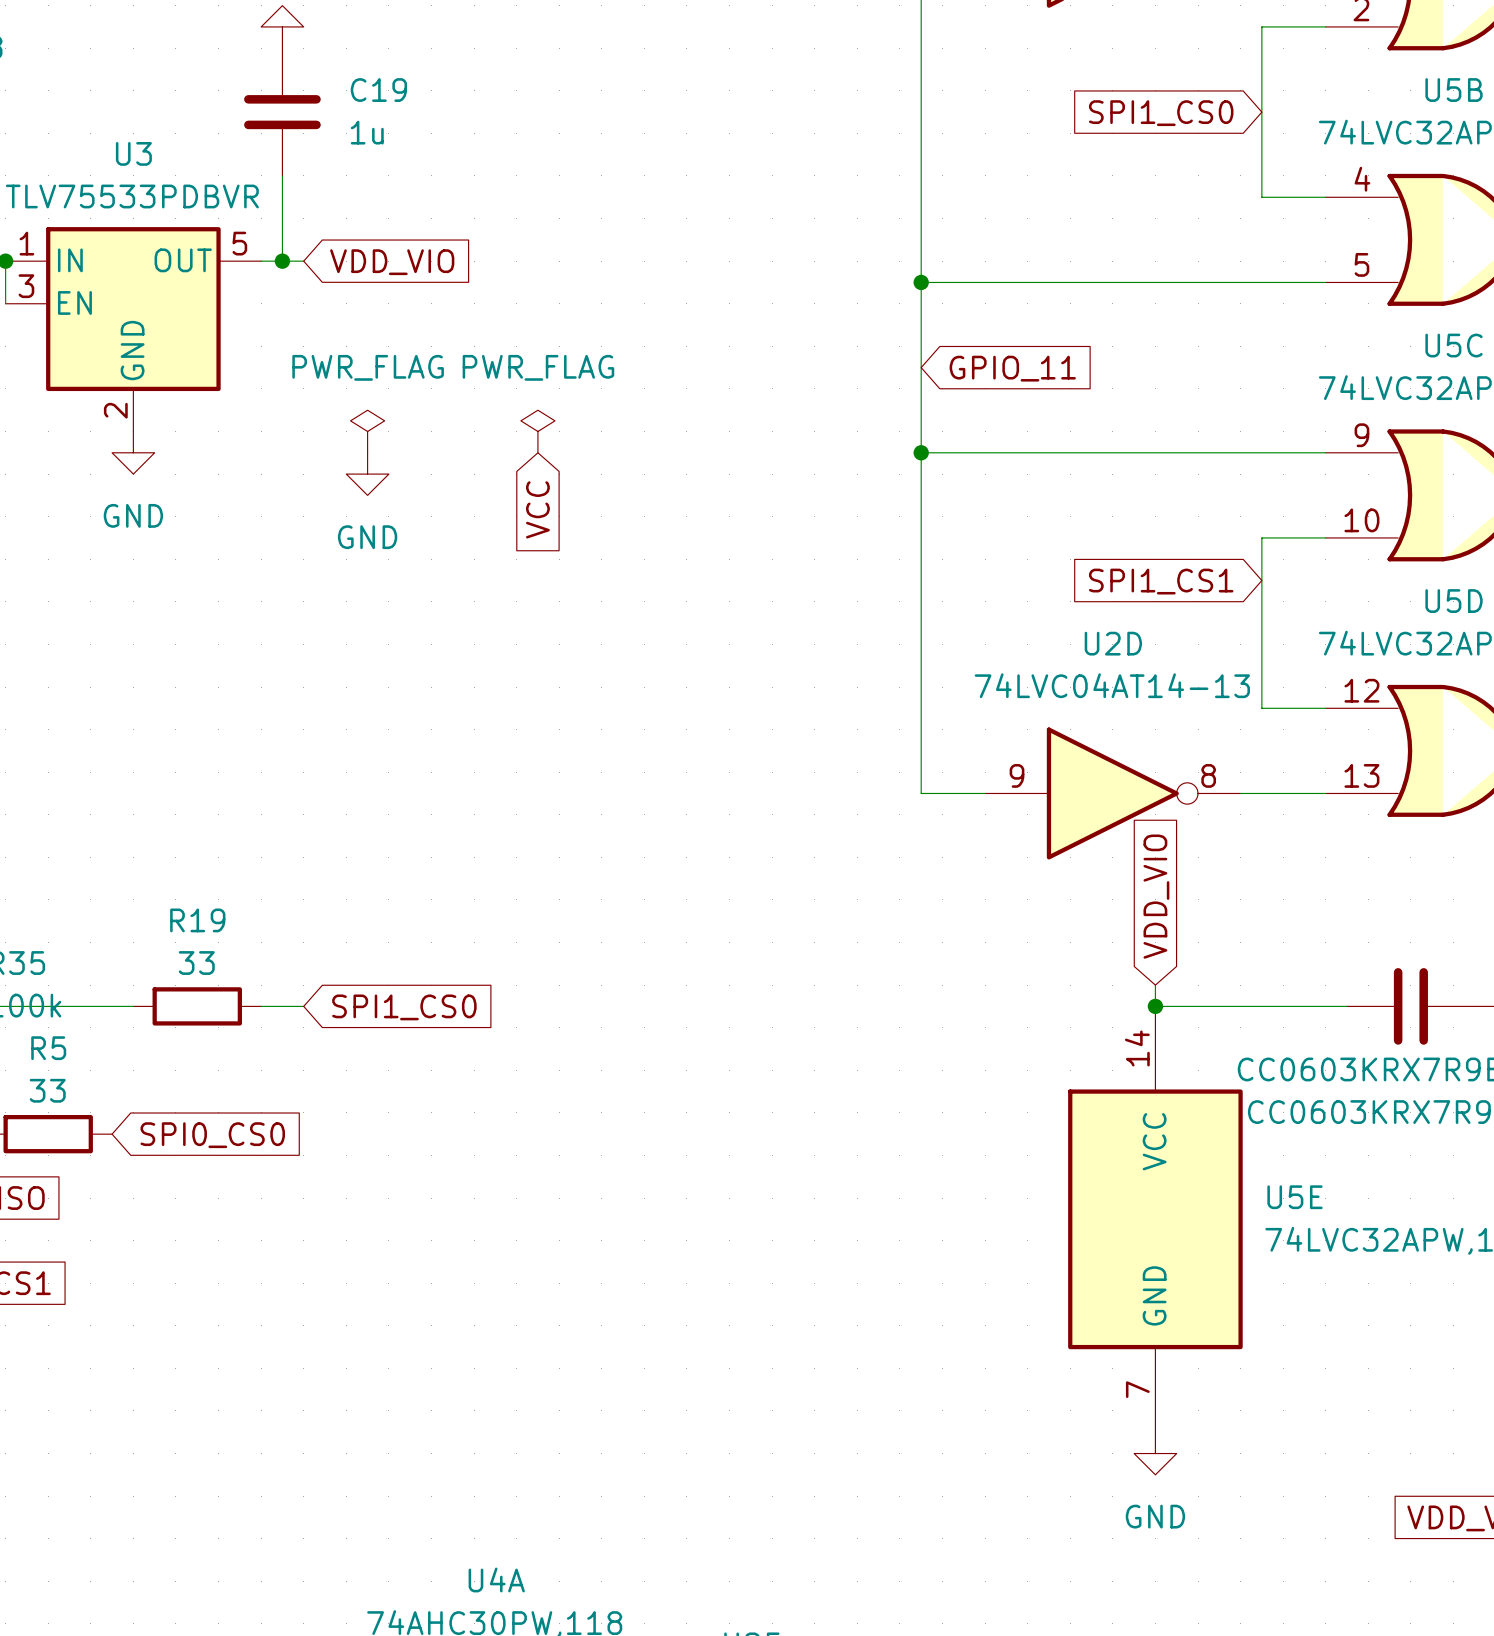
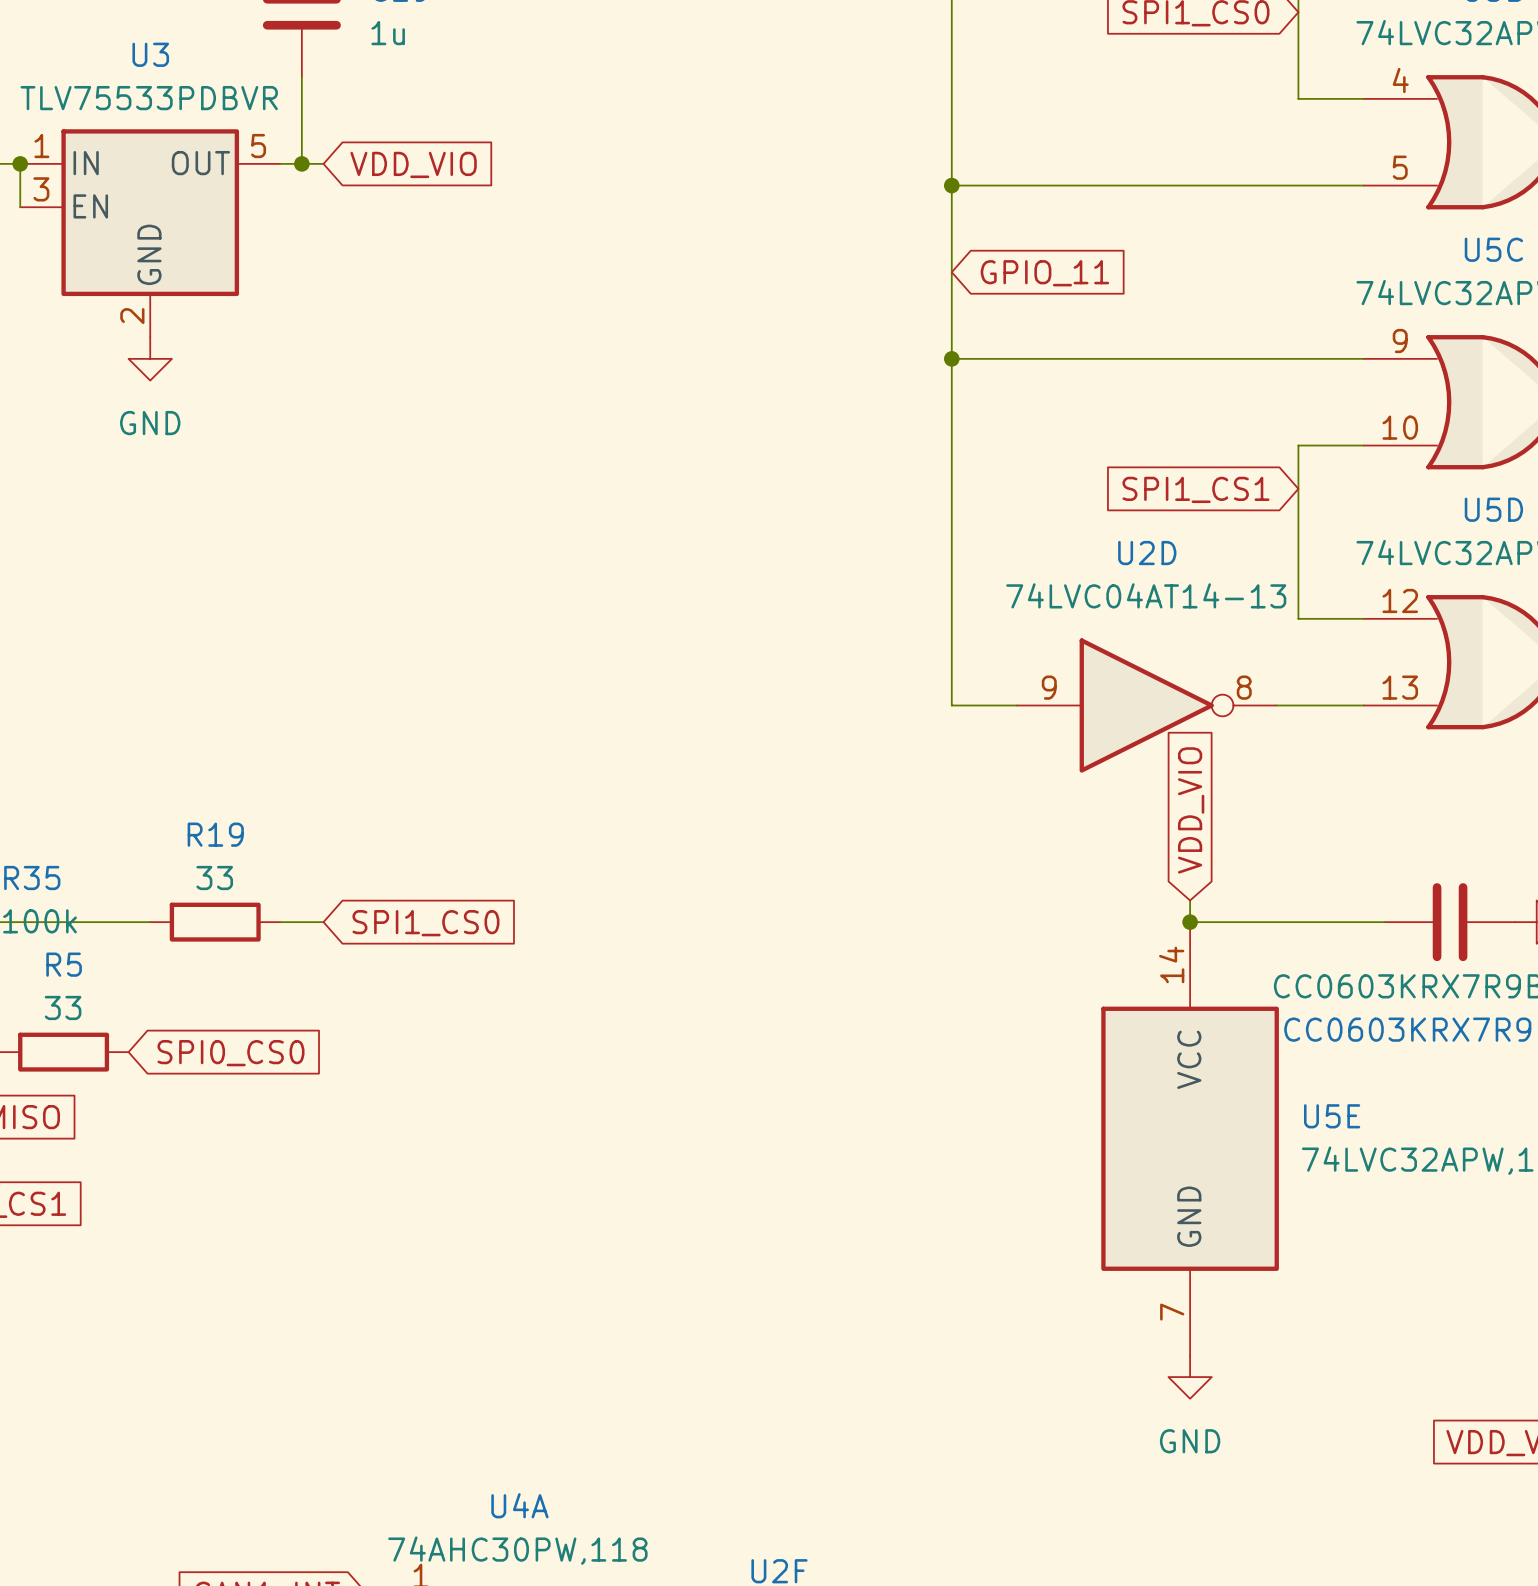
power symbol: PWR_FLAG (367, 431) -> none
power symbol: PWR_FLAG (537, 431) -> none
power symbol: GND (367, 474) -> none
global label: VCC (537, 509) -> none

